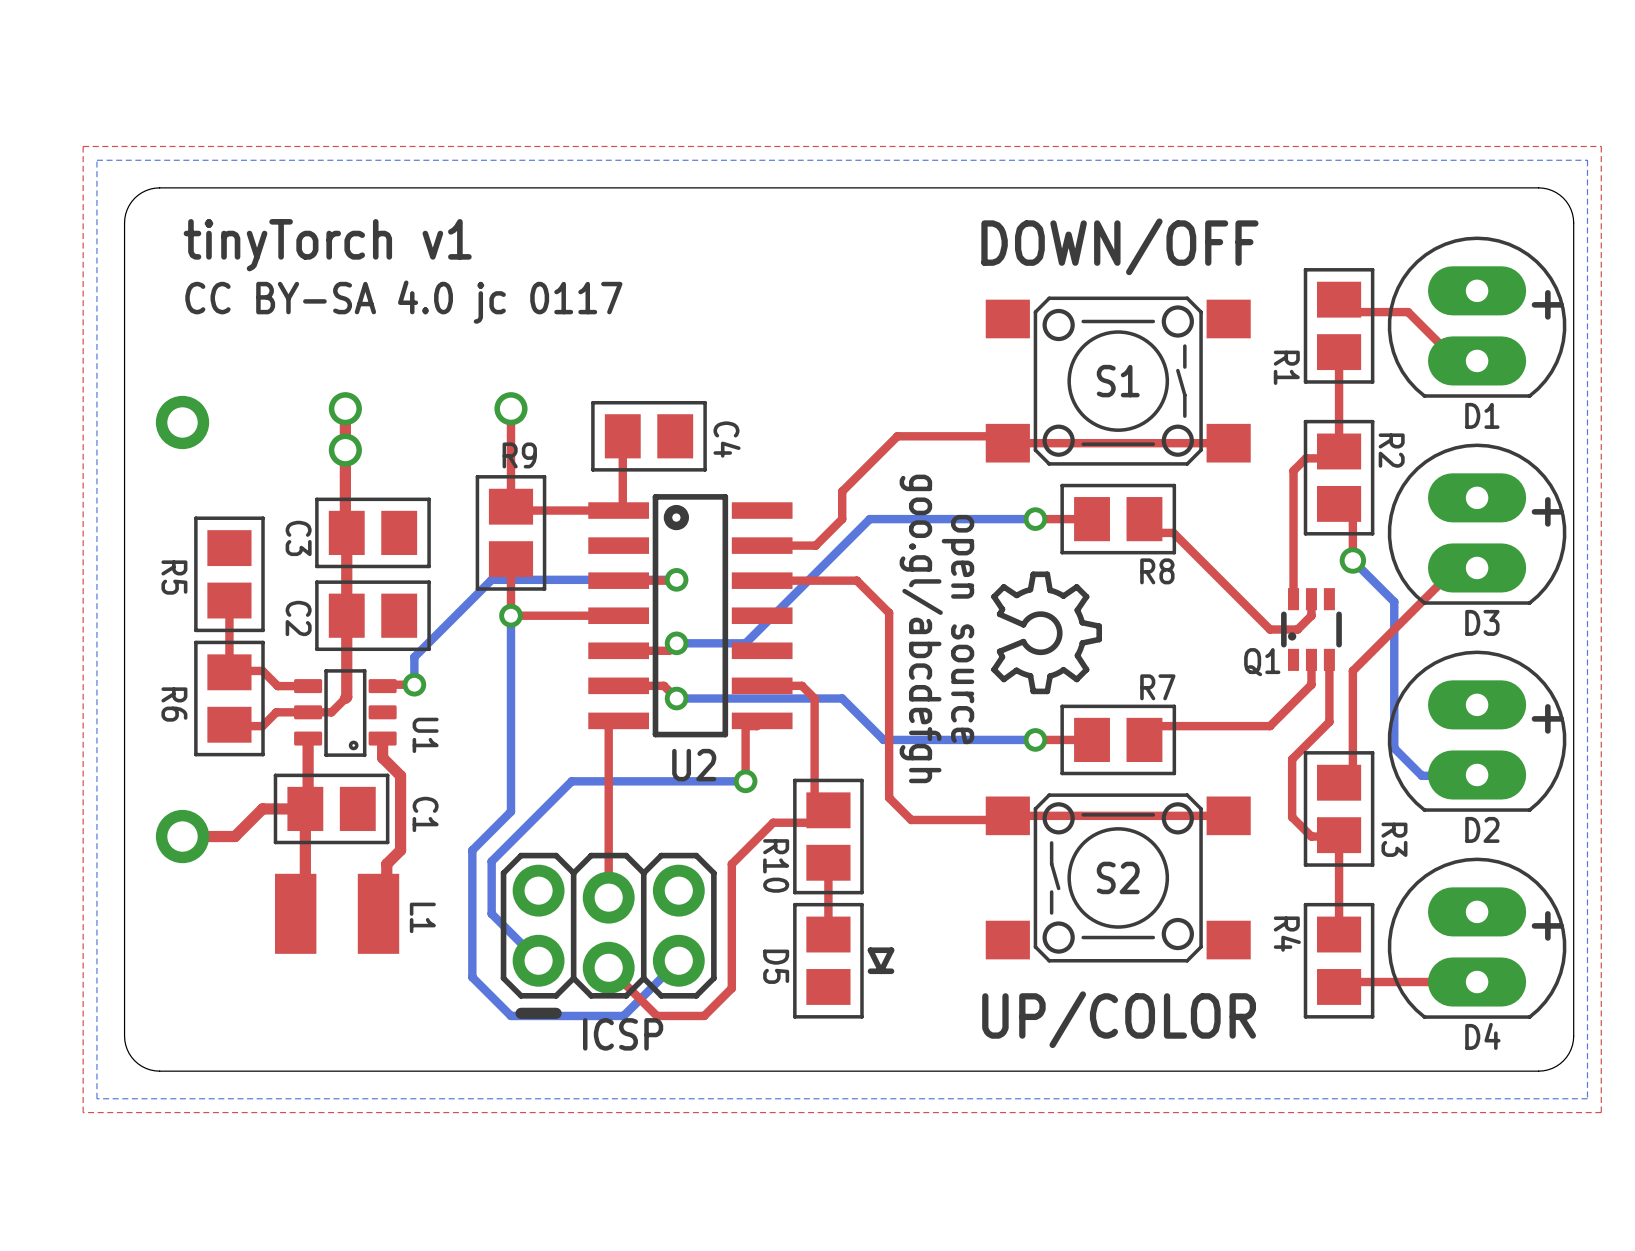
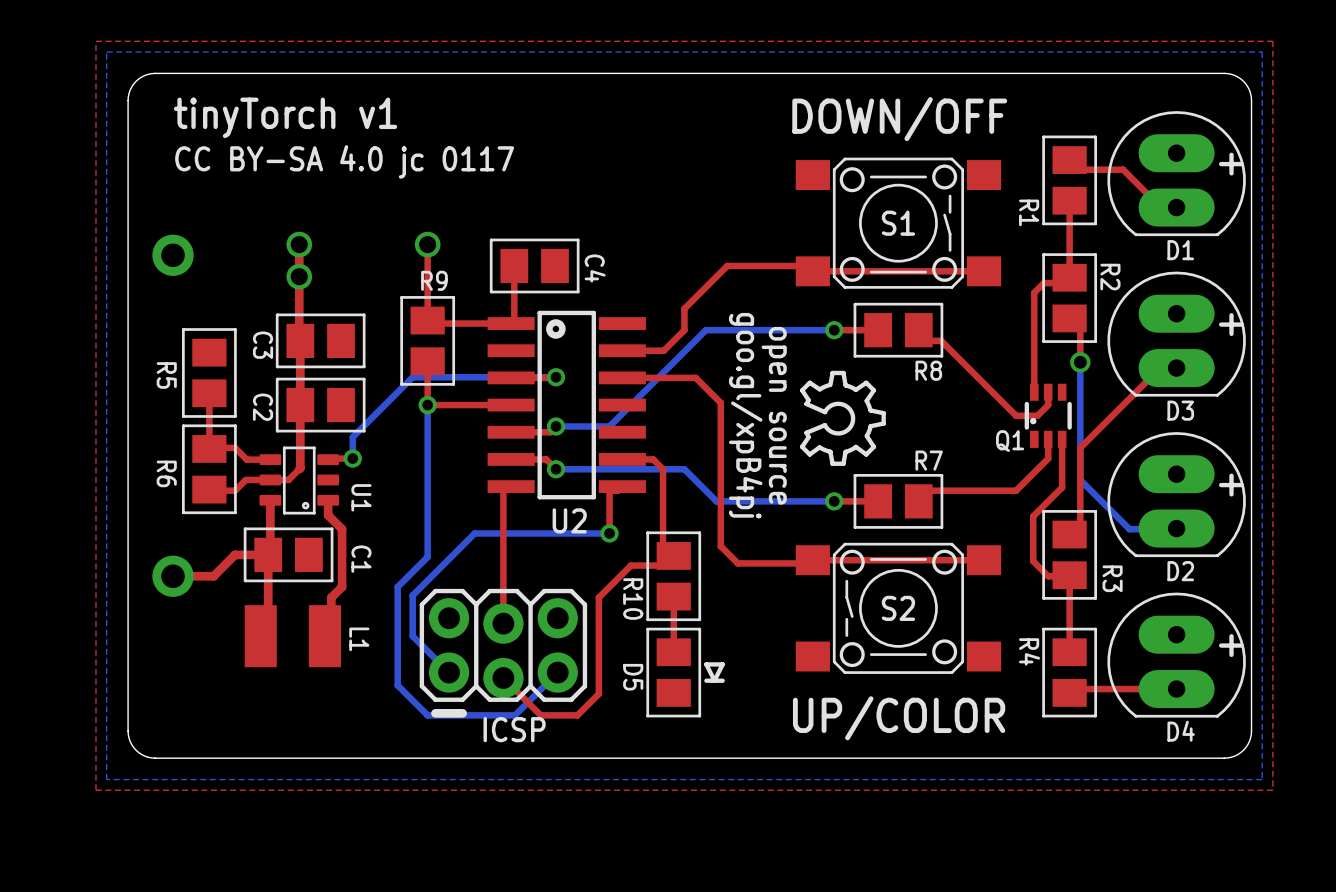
bottom track: (1352, 560) (1394, 601) (1394, 748) (1421, 775) -> (1080, 362) (1080, 479) (1129, 529) (1133, 529)
text: goo.gl/abcdefgh (921, 628) -> goo.gl/xpB4pj (745, 415)

